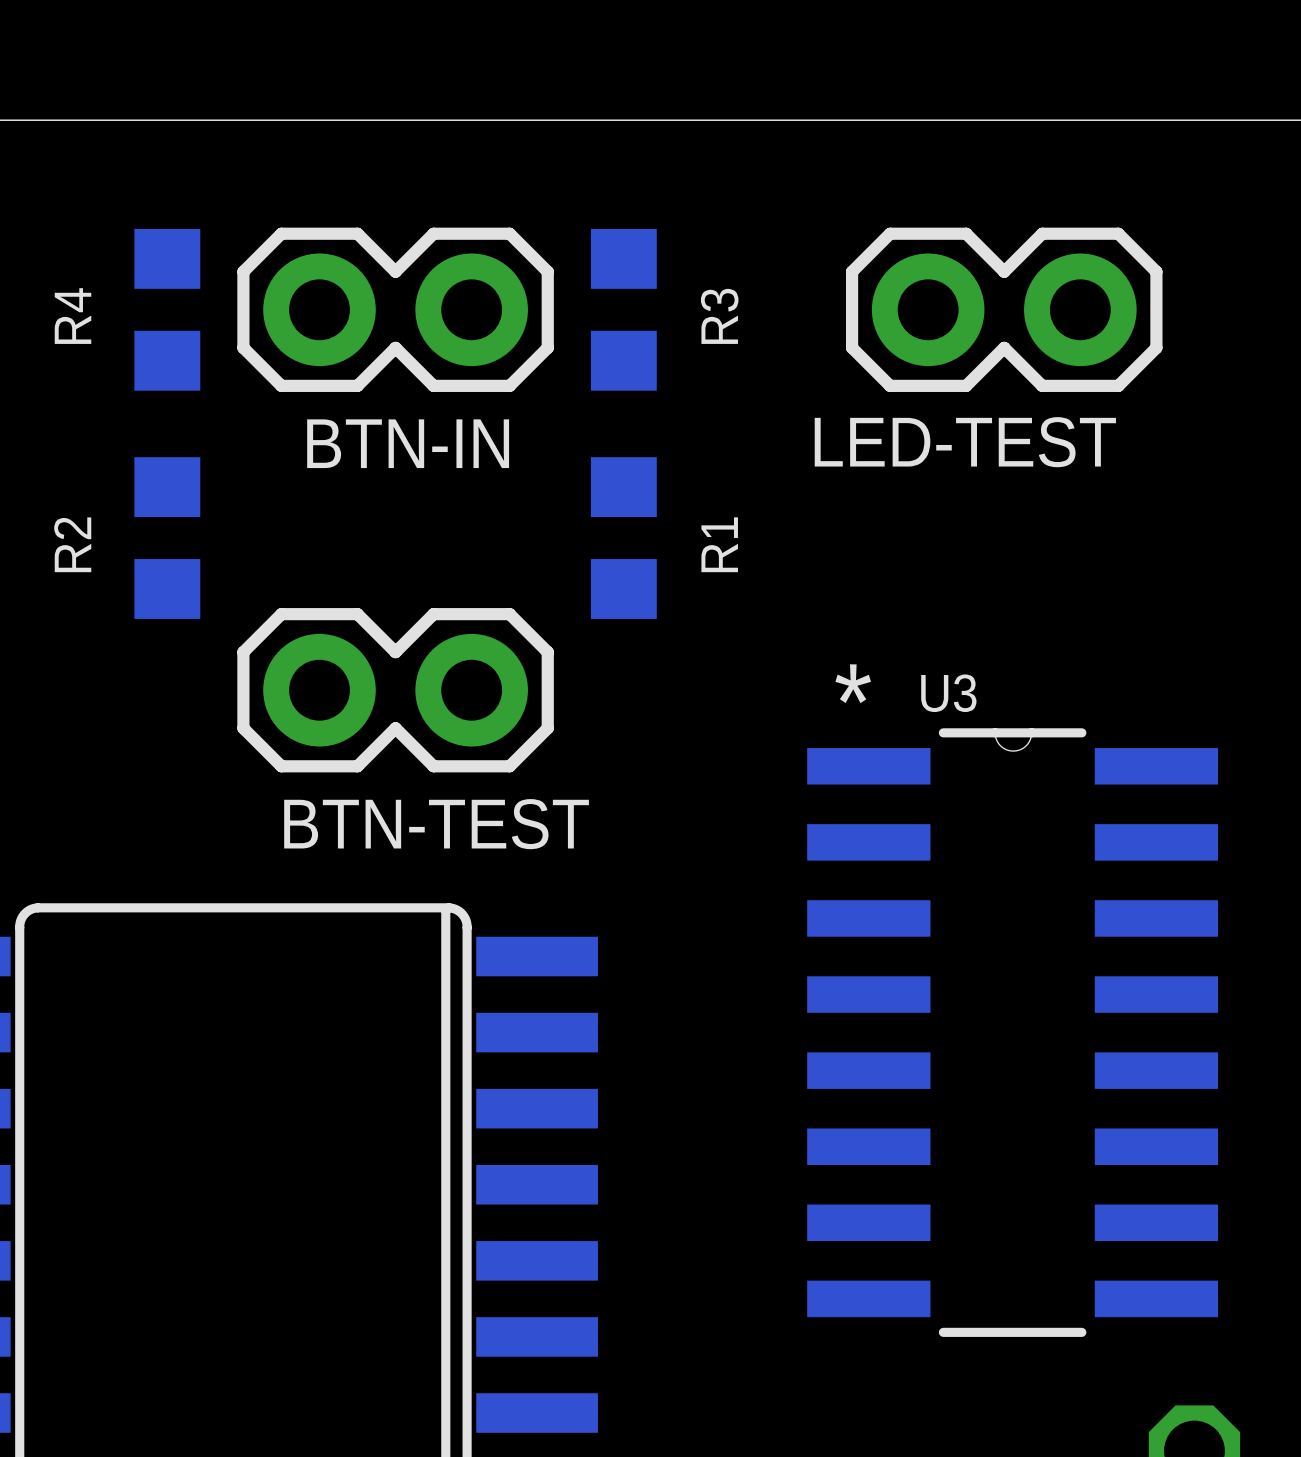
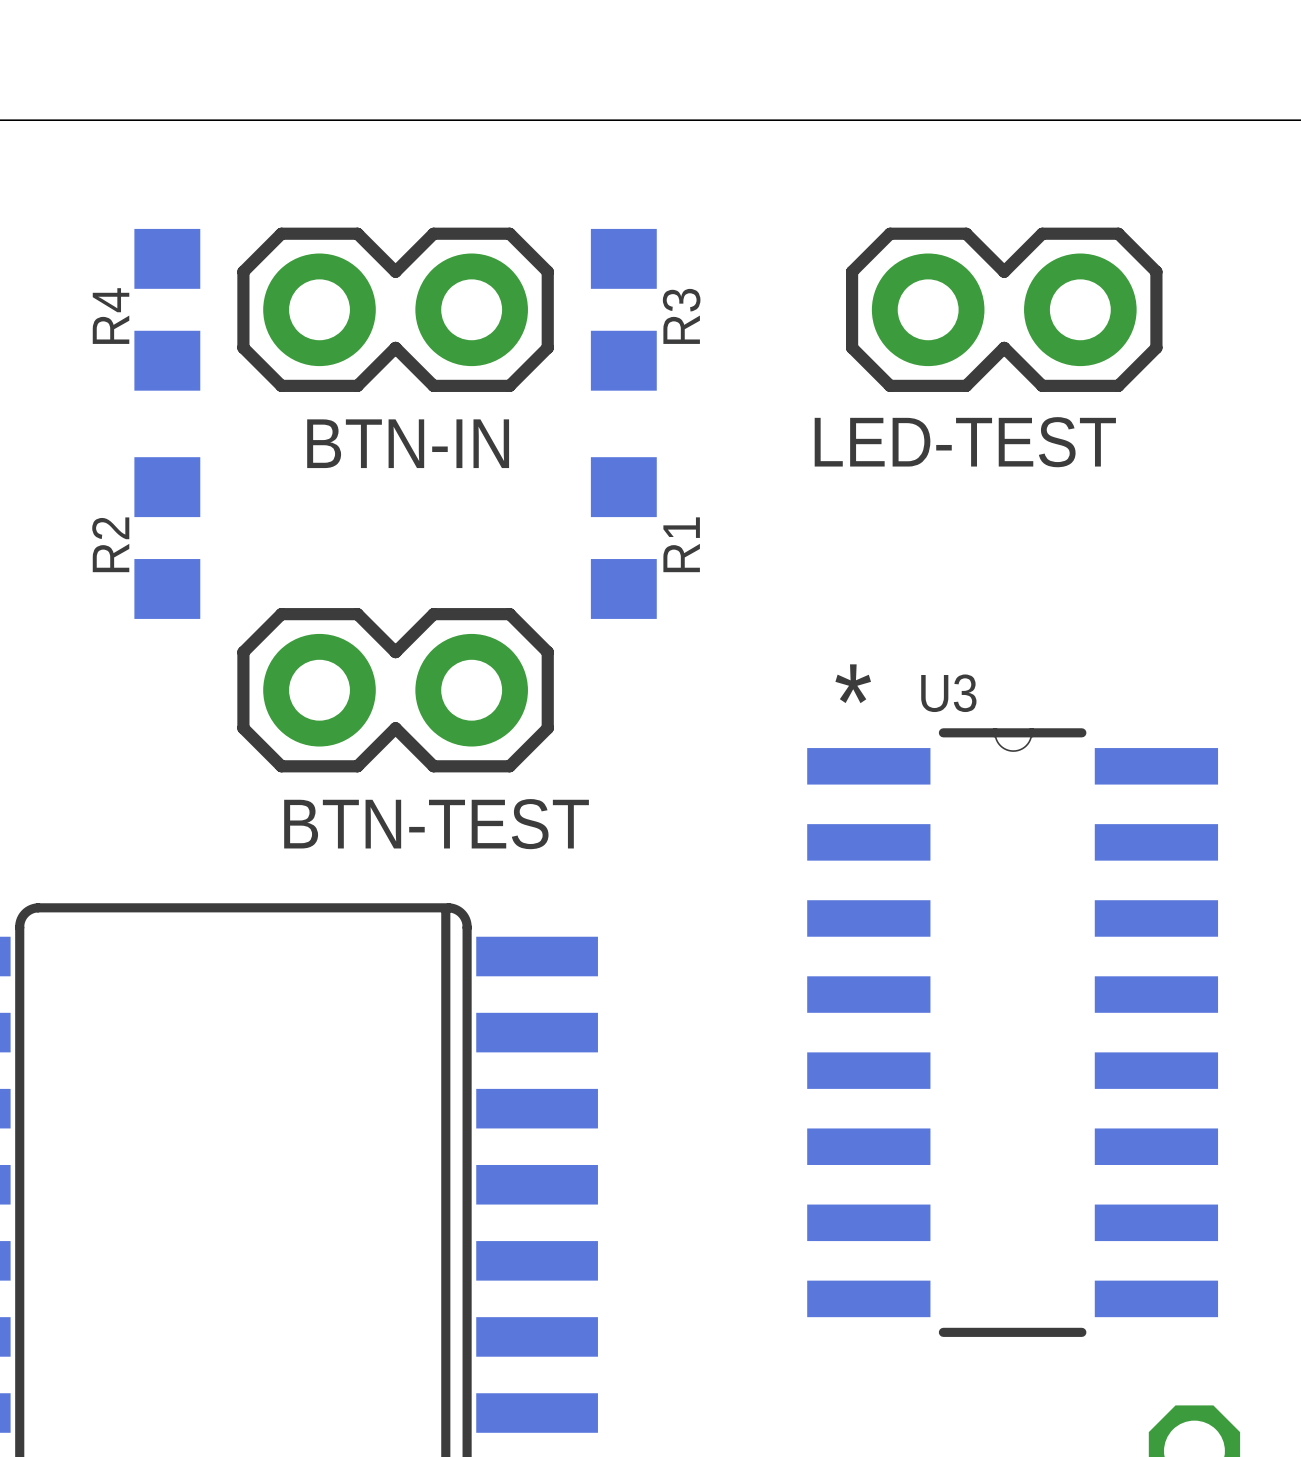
R4 name position: R4 (72, 316) -> R4 (111, 316)
R3 name position: R3 (719, 316) -> R3 (681, 316)
R2 name position: R2 (72, 544) -> R2 (110, 544)
R1 name position: R1 (719, 544) -> R1 (681, 544)

